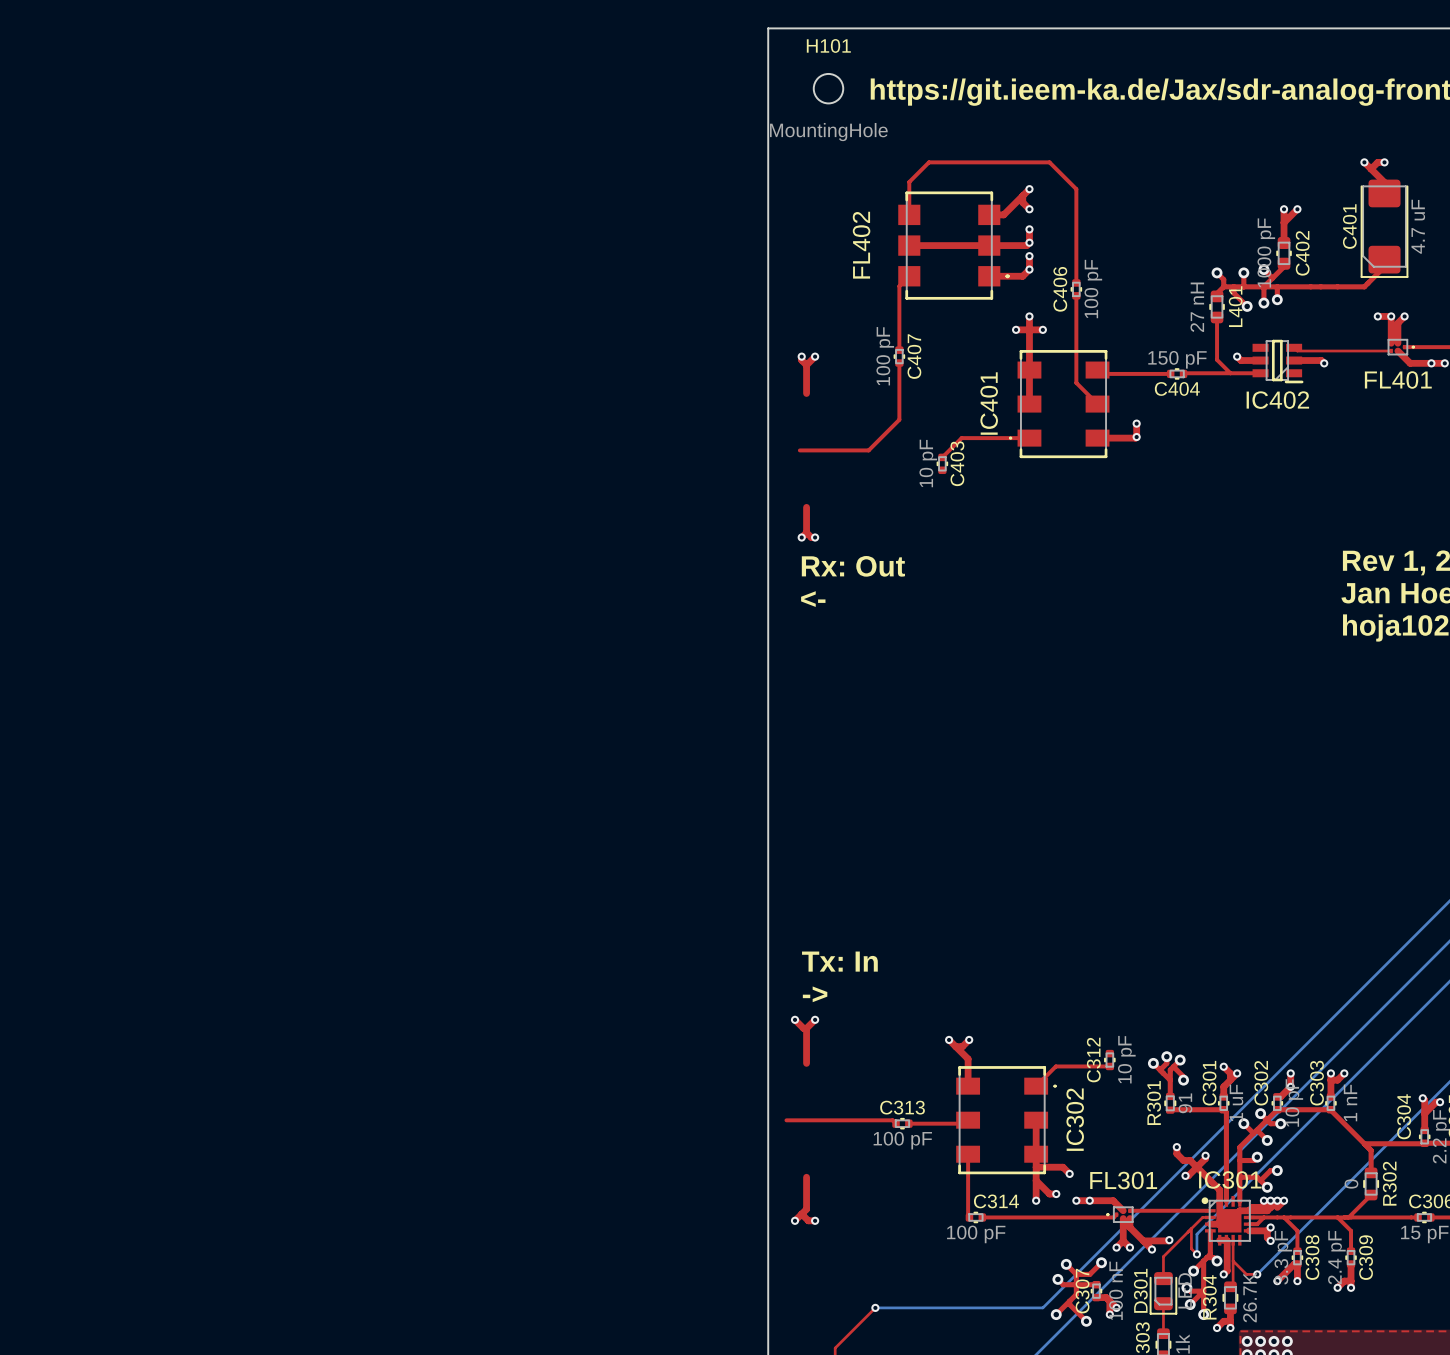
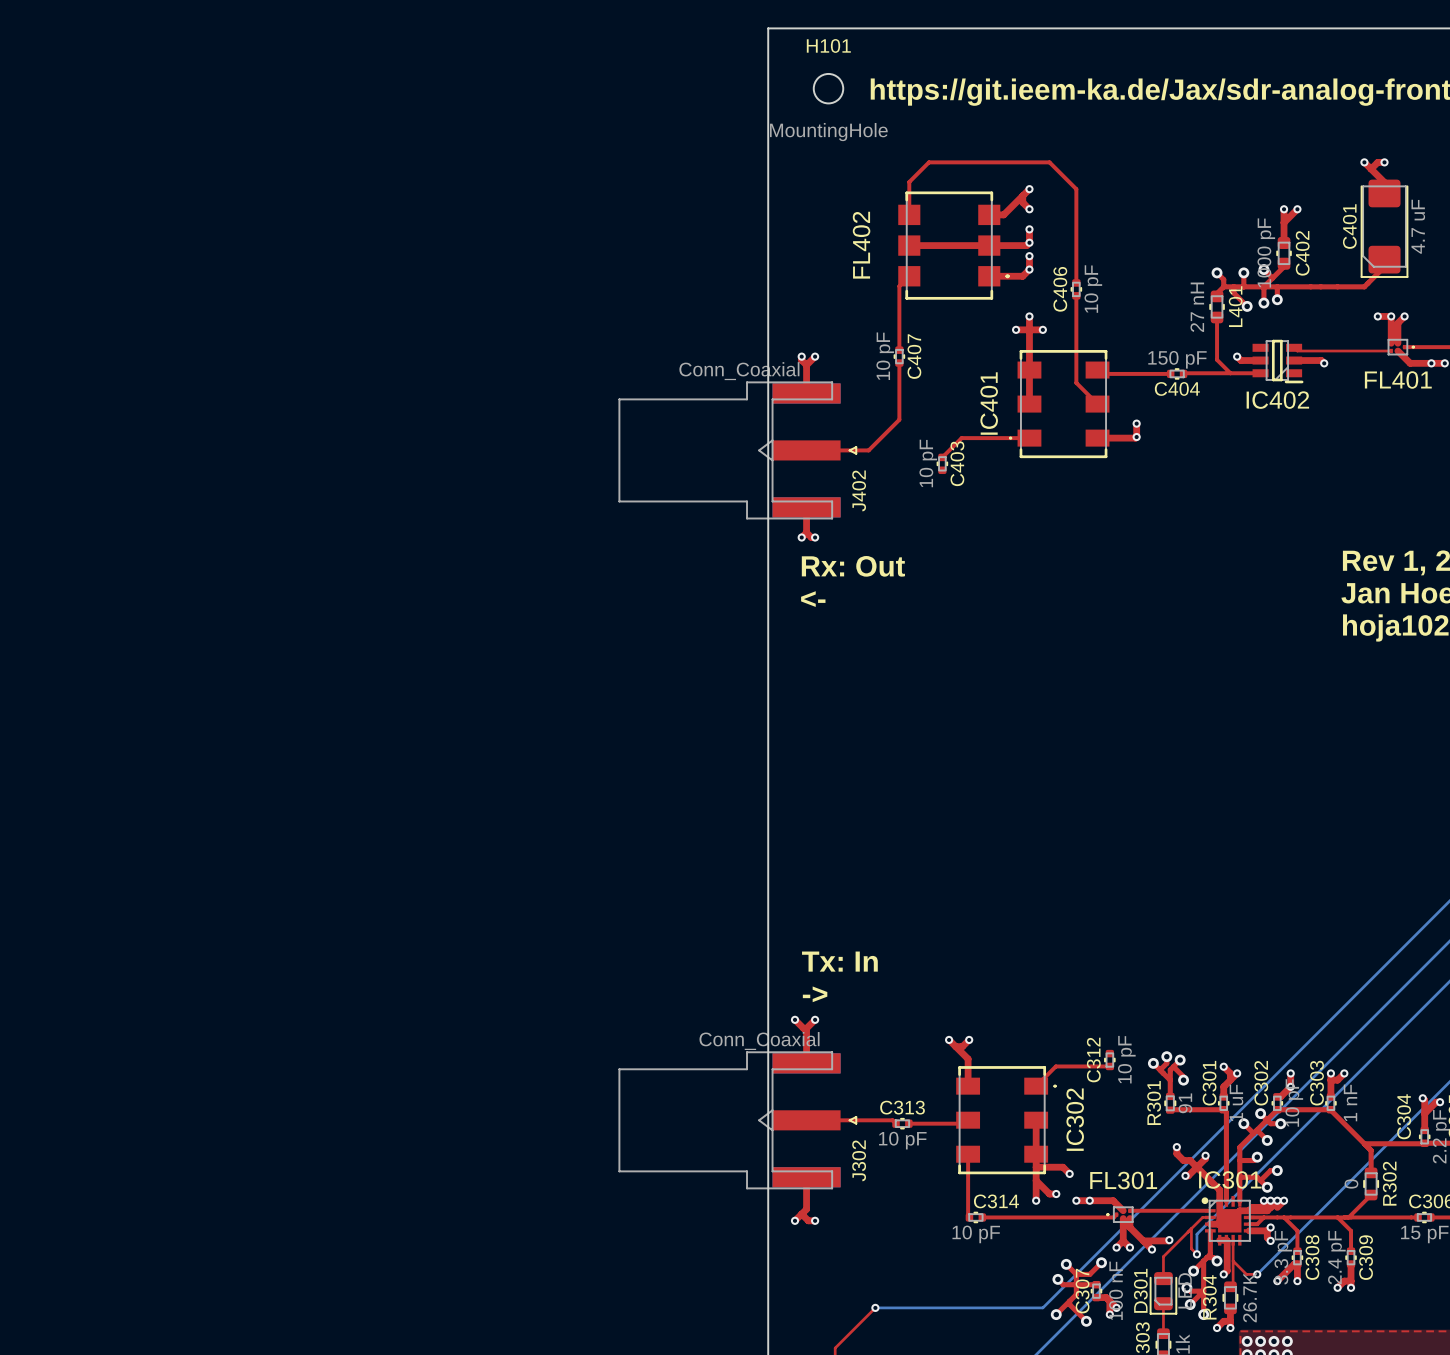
C406 value: 100 pF (1093, 289) -> 10 pF (1093, 289)
C407 value: 100 pF (885, 356) -> 10 pF (885, 356)
J402: none -> Conn_Coaxial (737, 450)
J302: none -> Conn_Coaxial (737, 1120)
C313 value: 100 pF (902, 1140) -> 10 pF (902, 1140)
C314 value: 100 pF (976, 1234) -> 10 pF (976, 1234)

